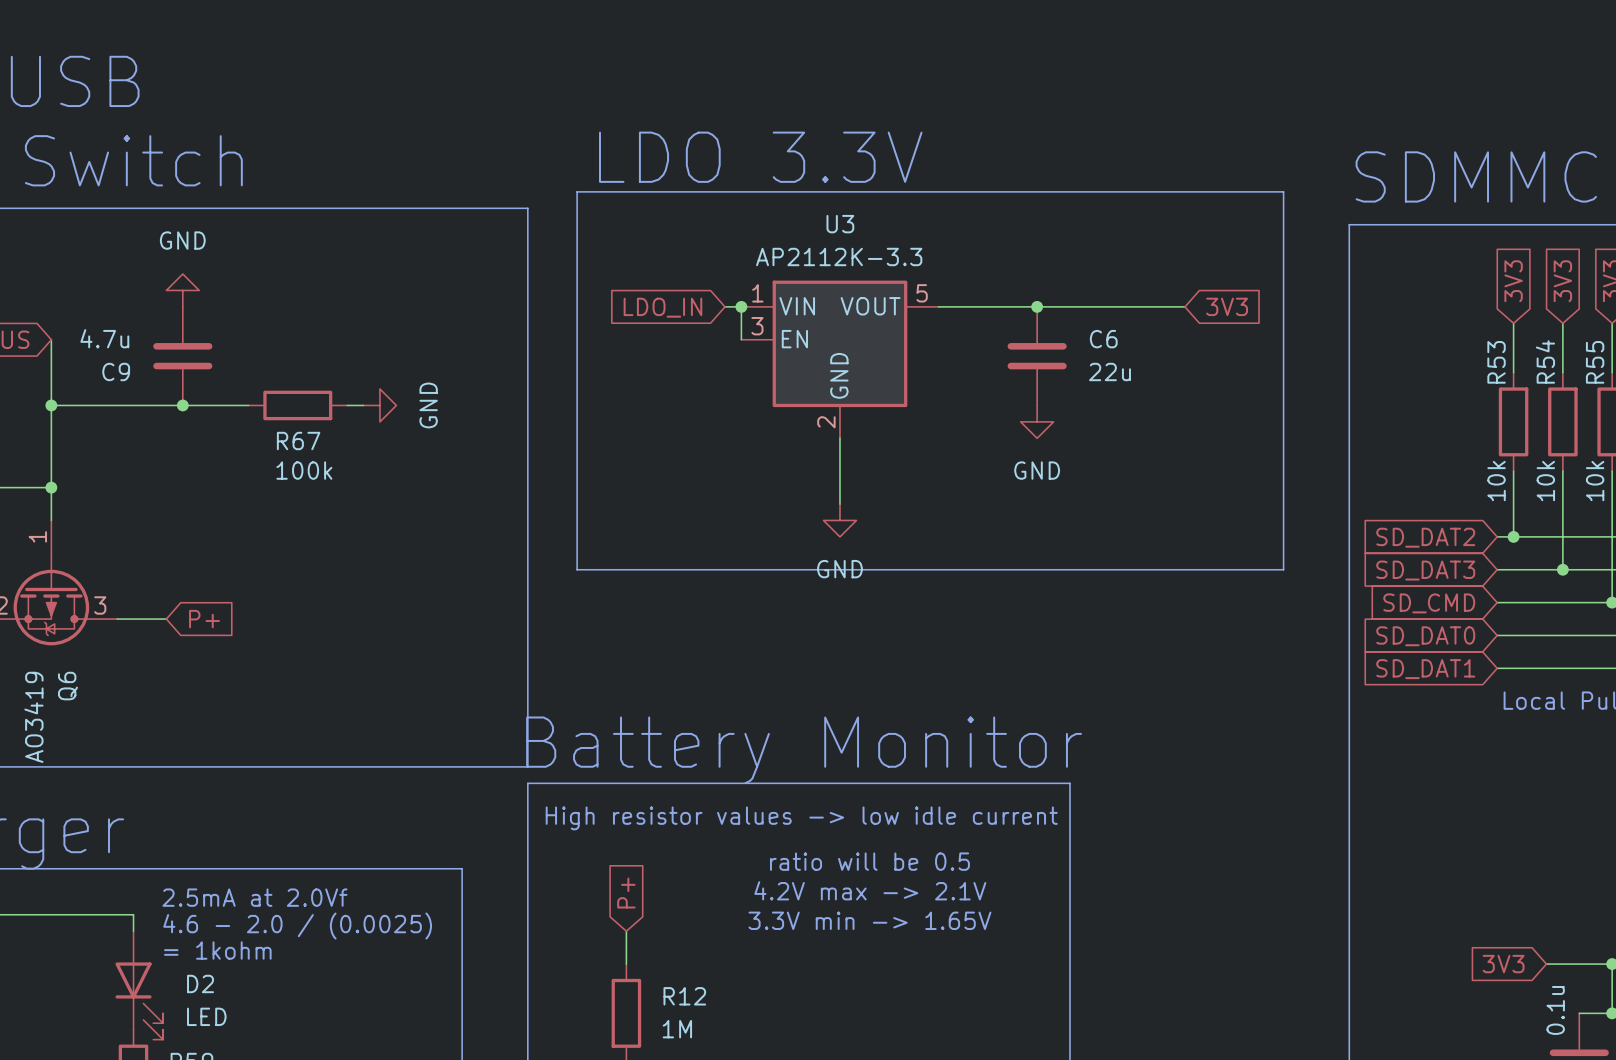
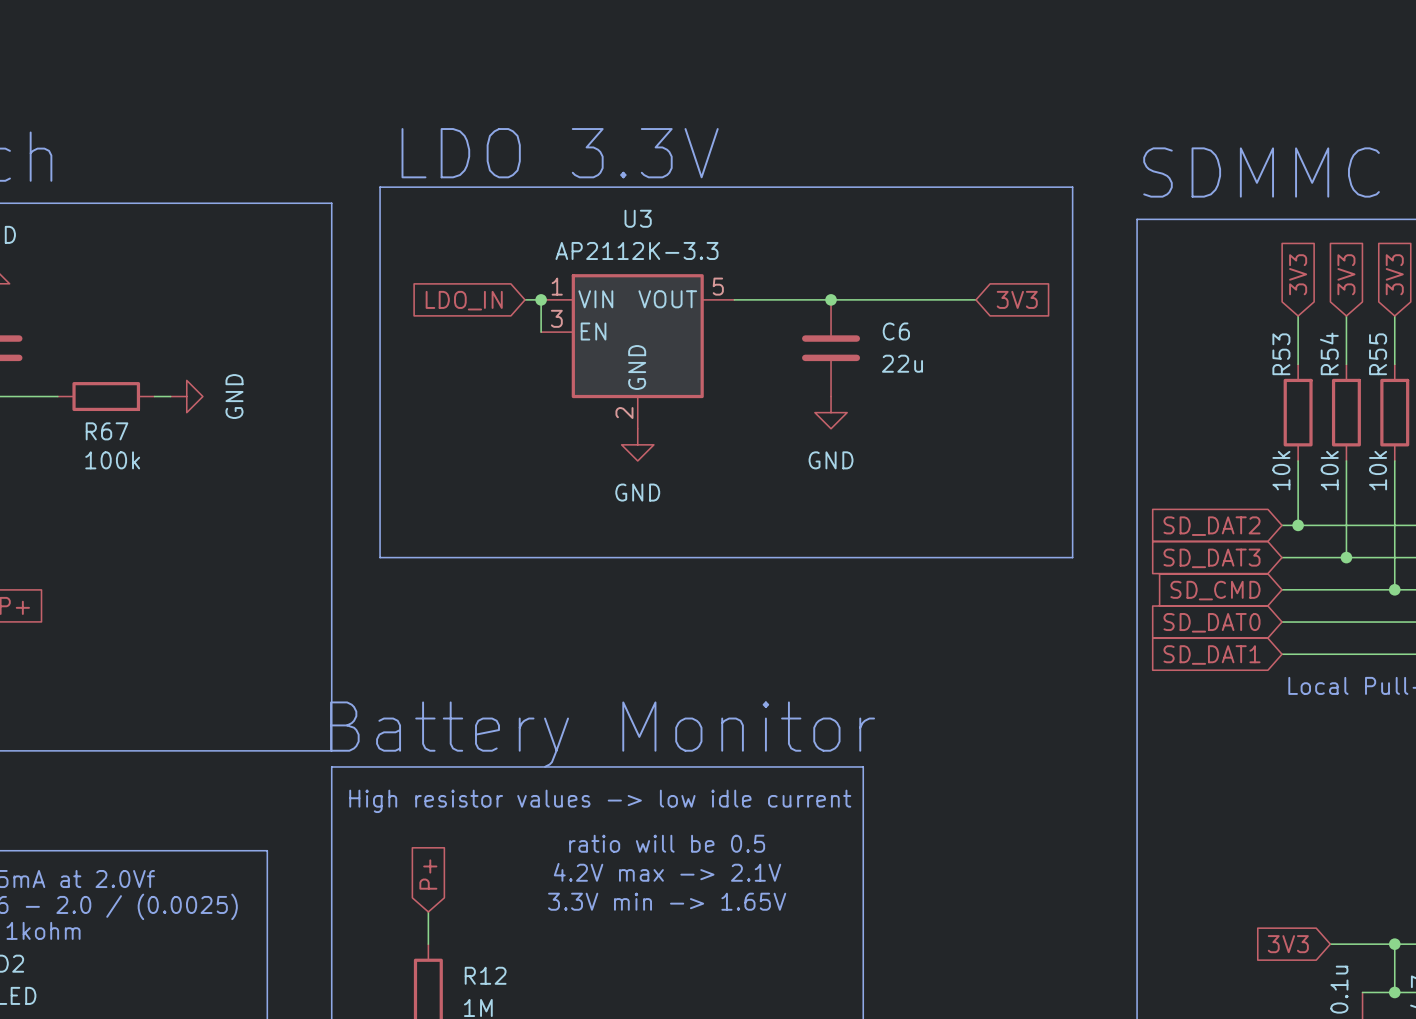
wire: (839, 438) (839, 504) -> none
power symbol position: GND (839, 520) -> GND (637, 444)

